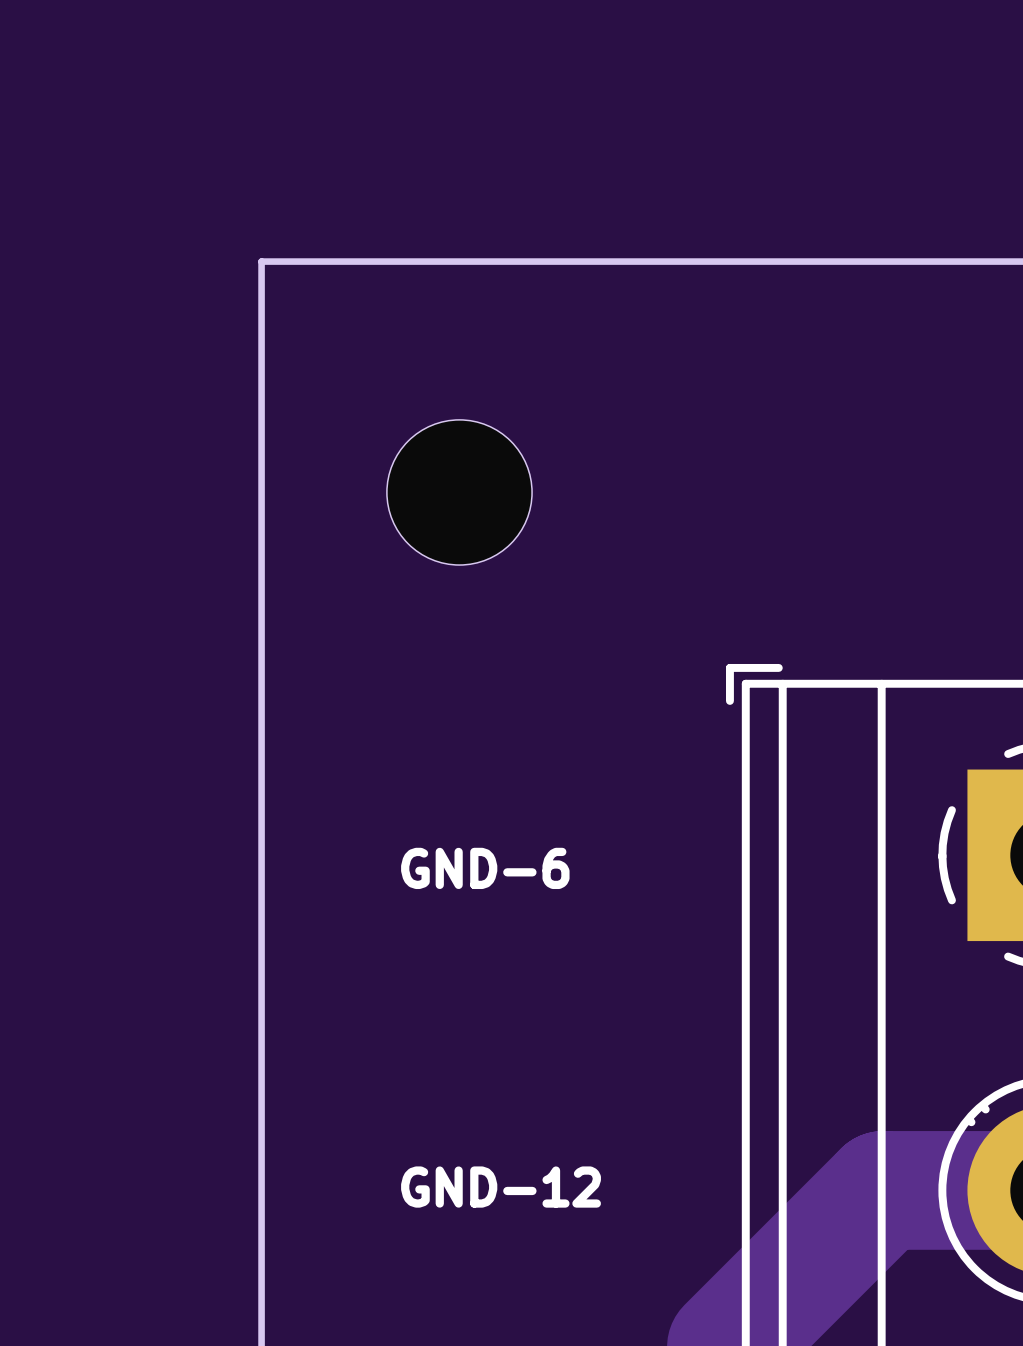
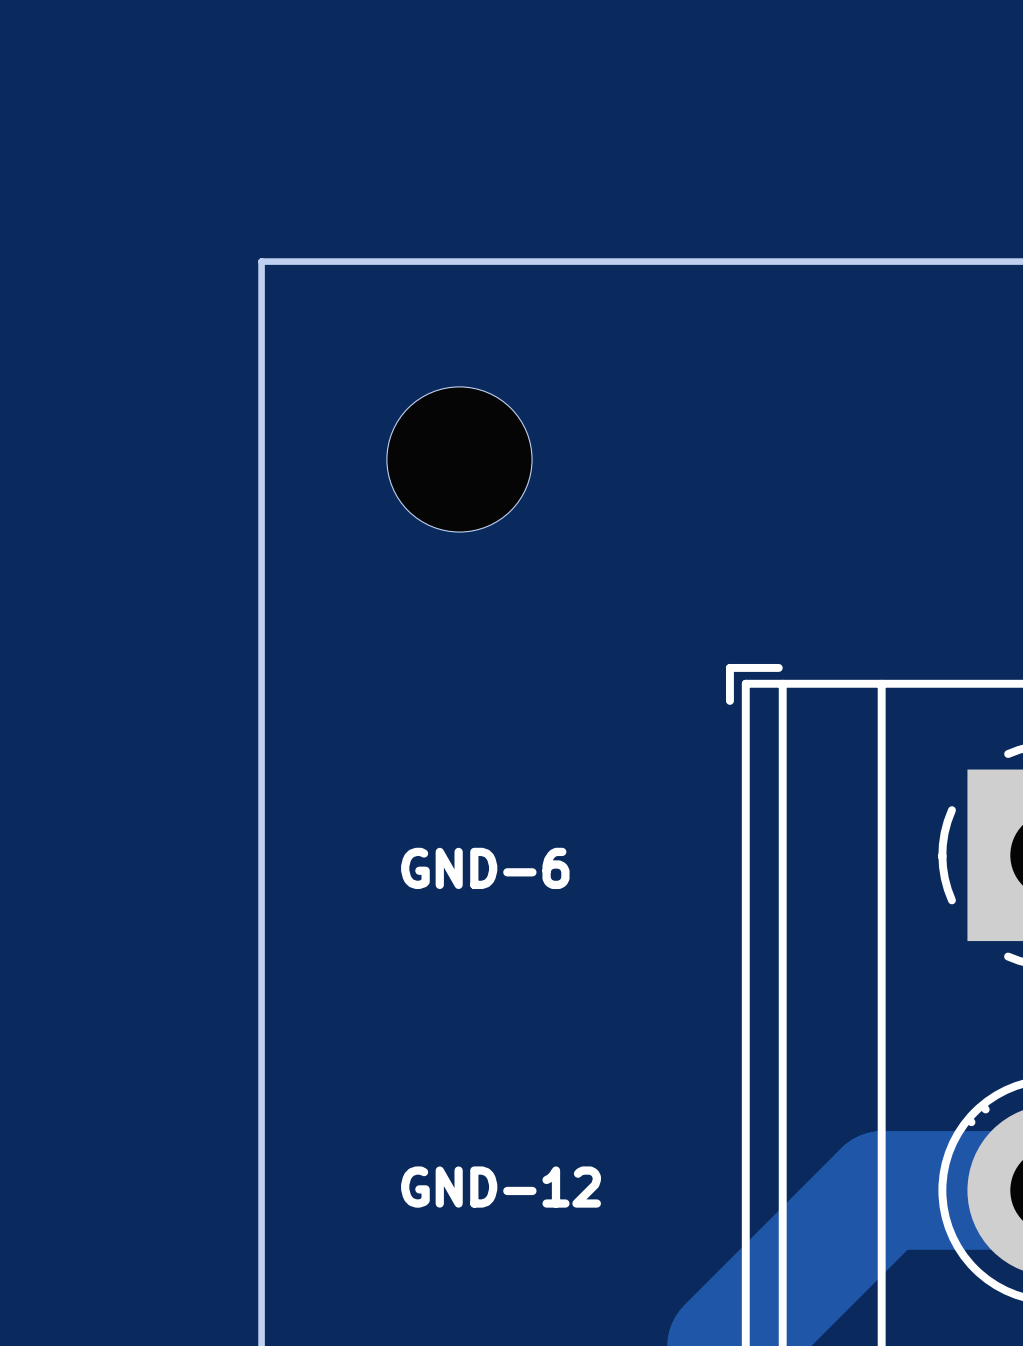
part position: (459, 492) -> (459, 459)

